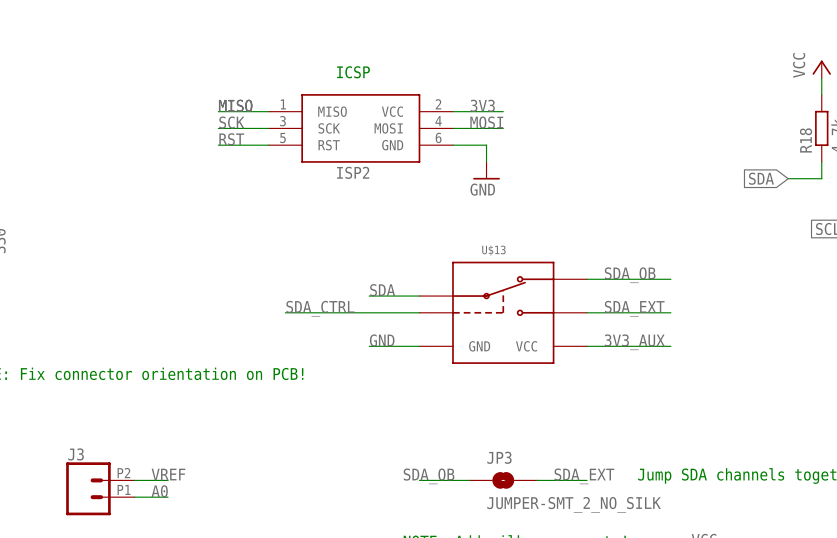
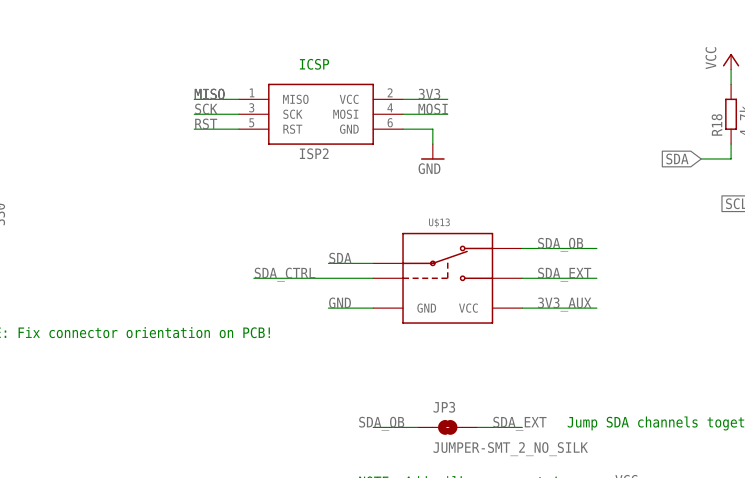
label: VREF (168, 474) -> none
wire: (134, 480) (168, 480) -> none
J3: (100, 488) -> none
label: A0 (159, 491) -> none
wire: (134, 497) (168, 497) -> none

